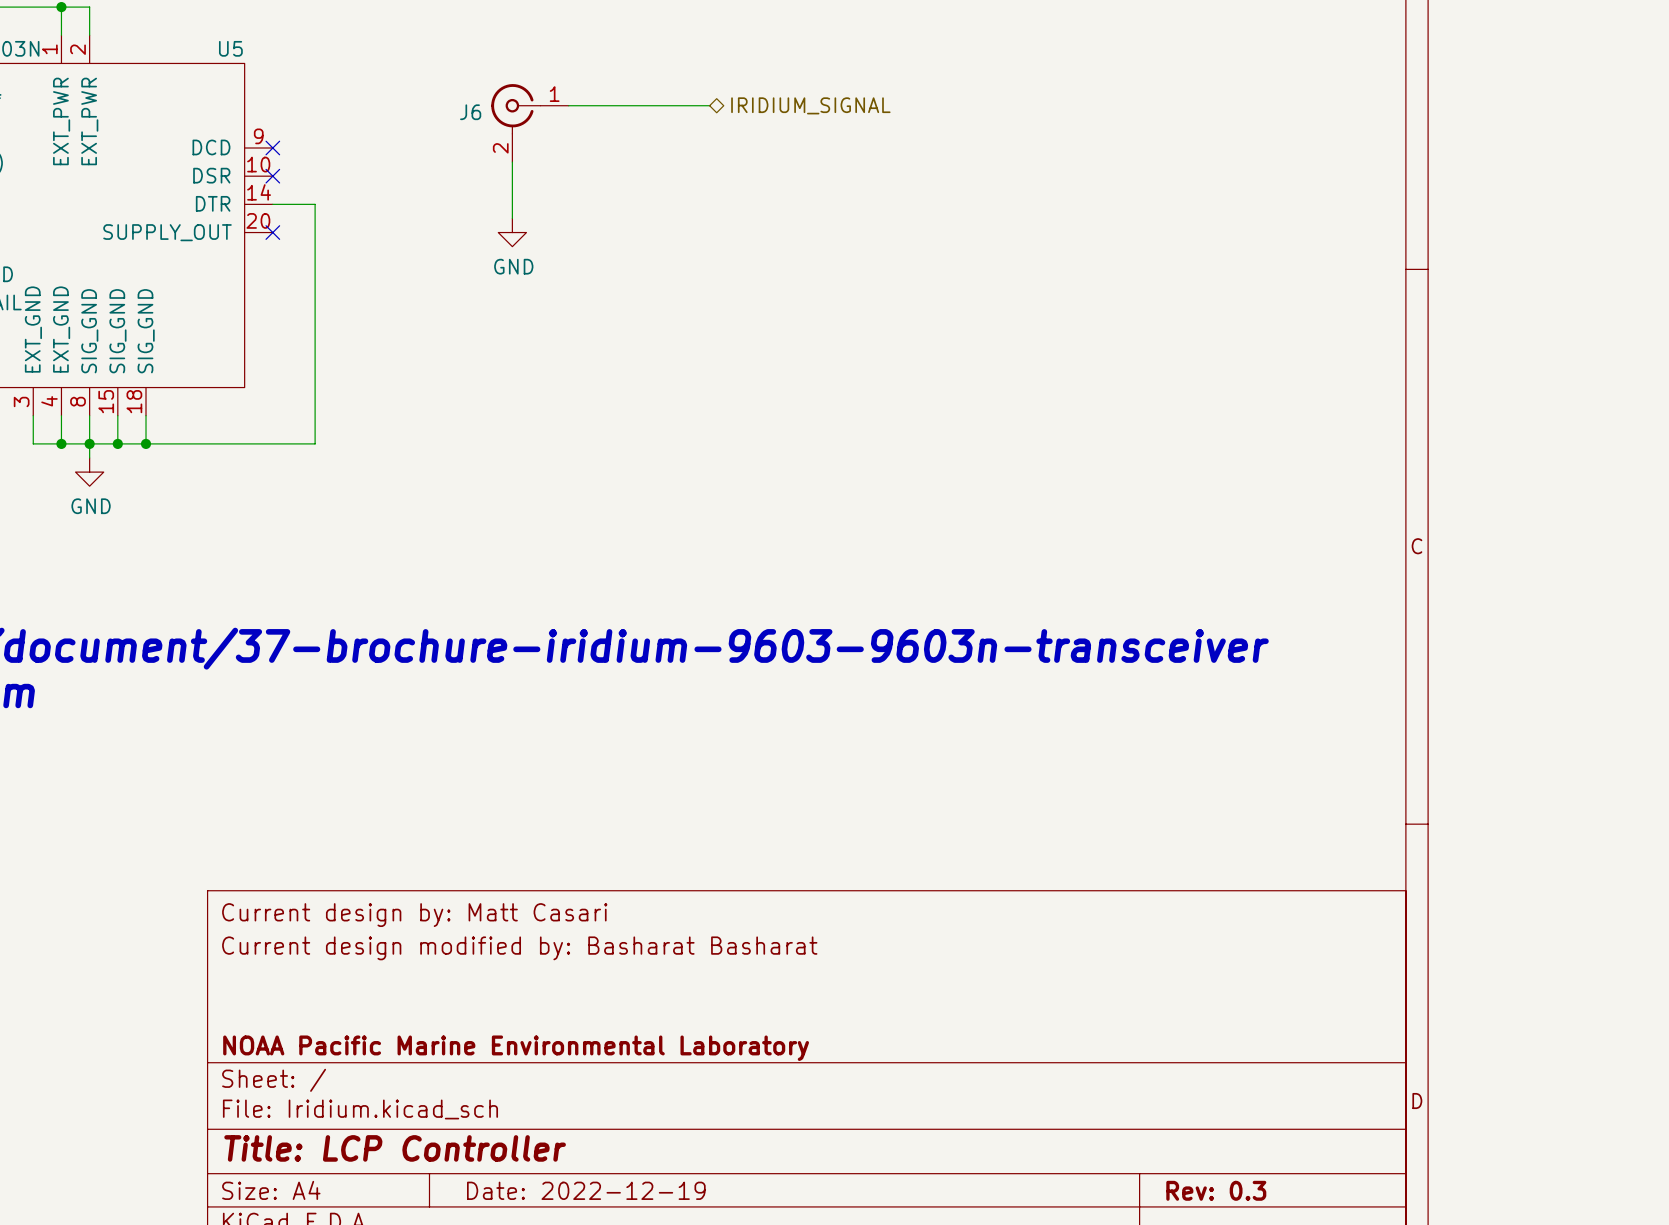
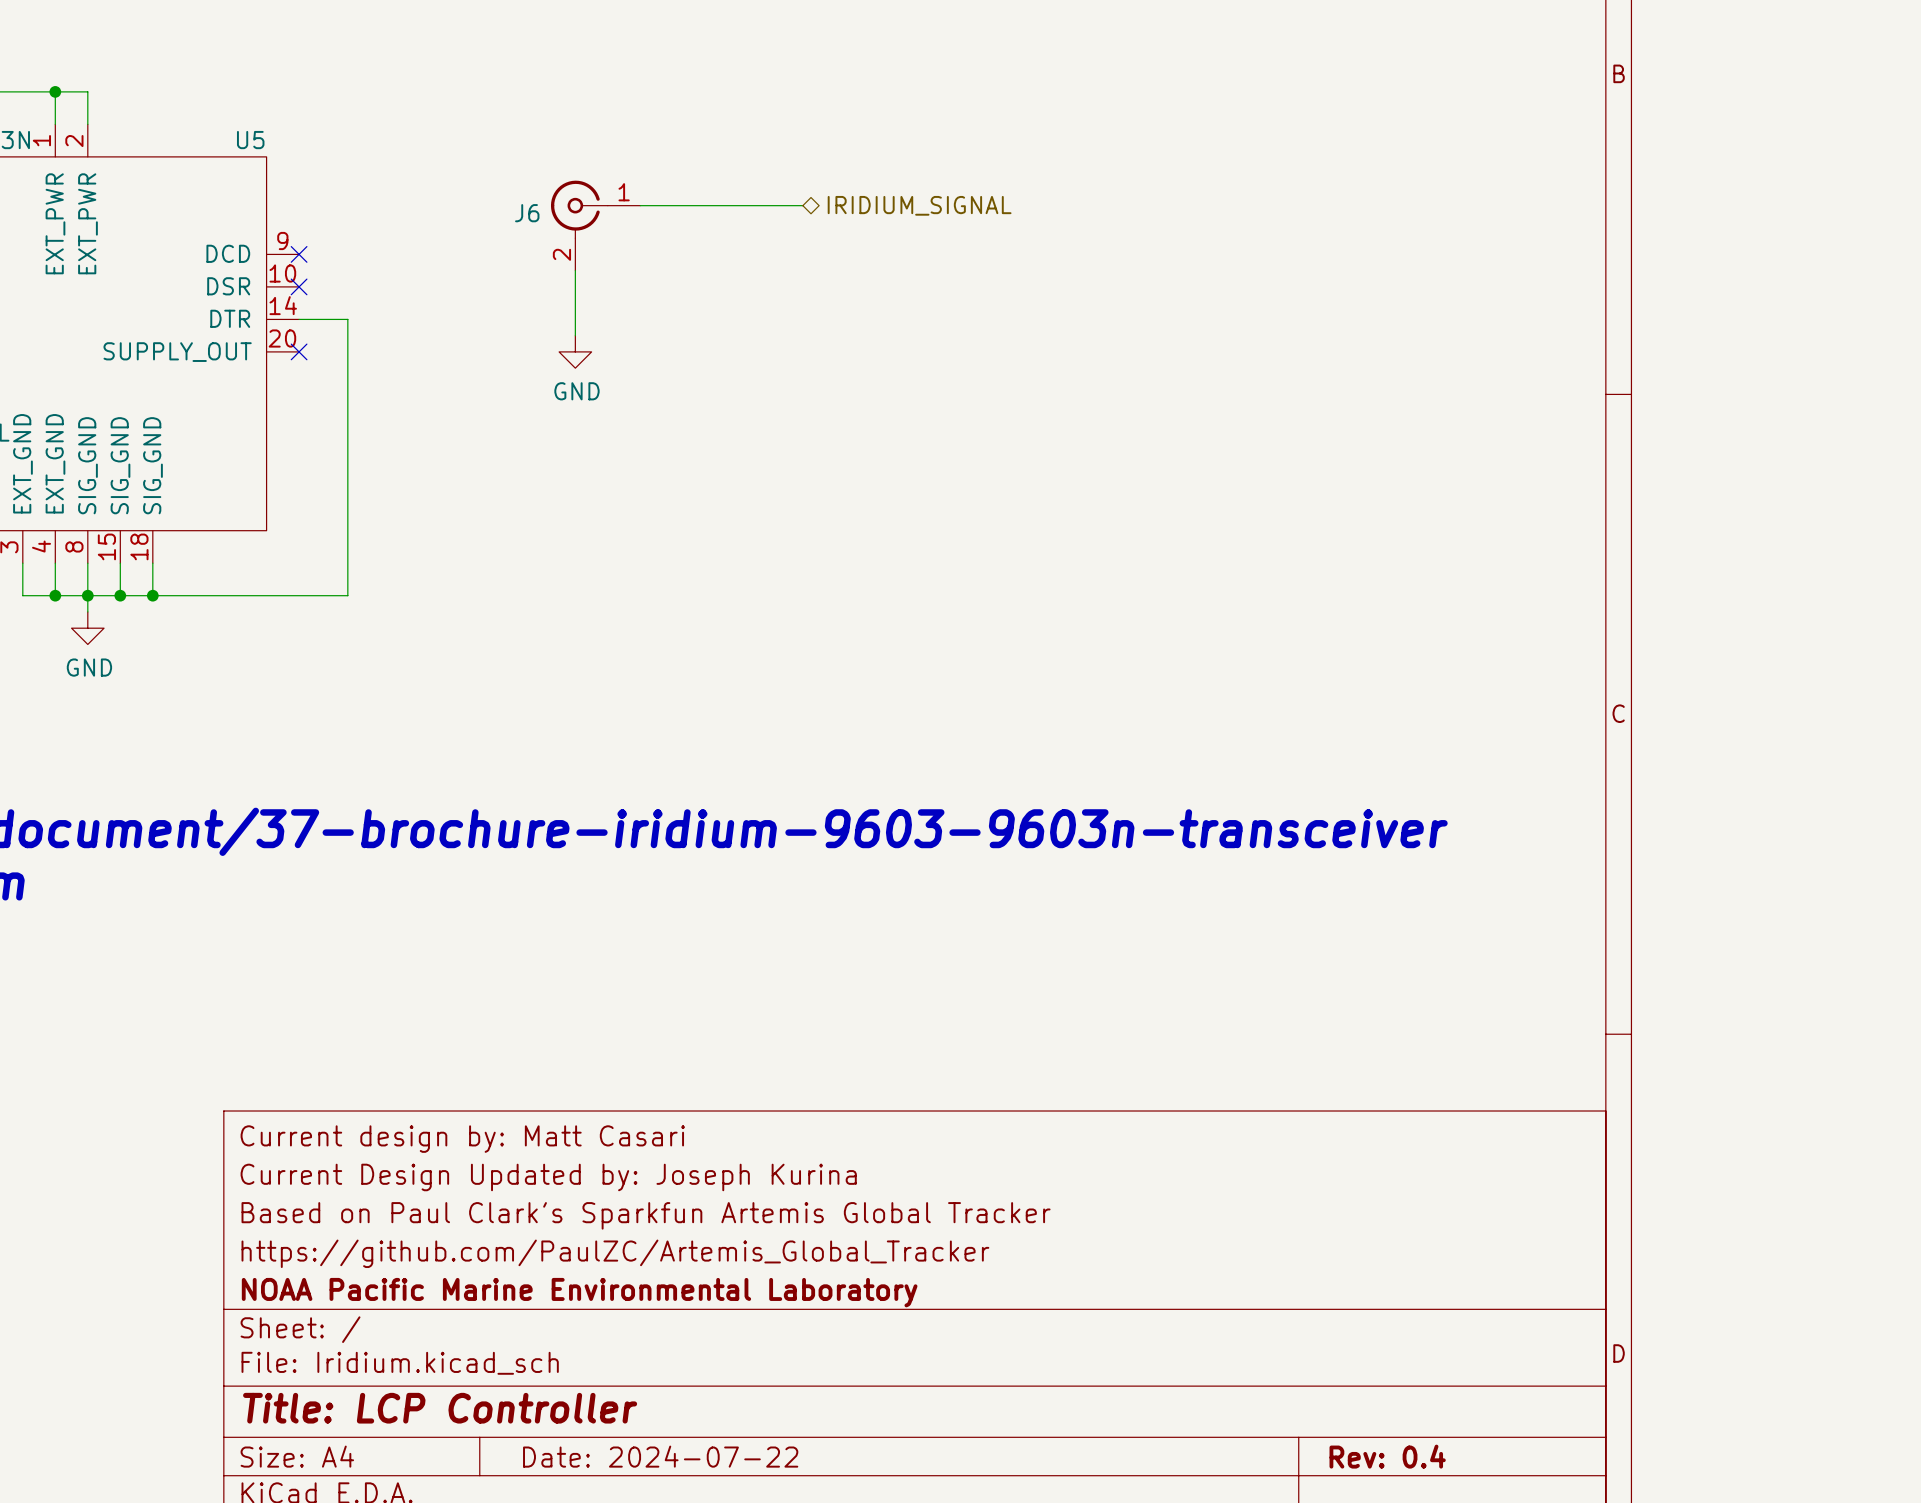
title block: Current design modified by: Basharat Basharat (519, 948) -> Current Design Updated by: Joseph Kurina (548, 1177)
title block: none -> Based on Paul Clark's Sparkfun Artemis Global Tracker (646, 1215)
title block: none -> https://github.com/PaulZC/Artemis_Global_Tracker (615, 1253)
title block: Date: 2022-12-19 (586, 1190) -> Date: 2024-07-22 (660, 1456)
title block: Rev: 0.3 (1216, 1190) -> Rev: 0.4 (1387, 1456)

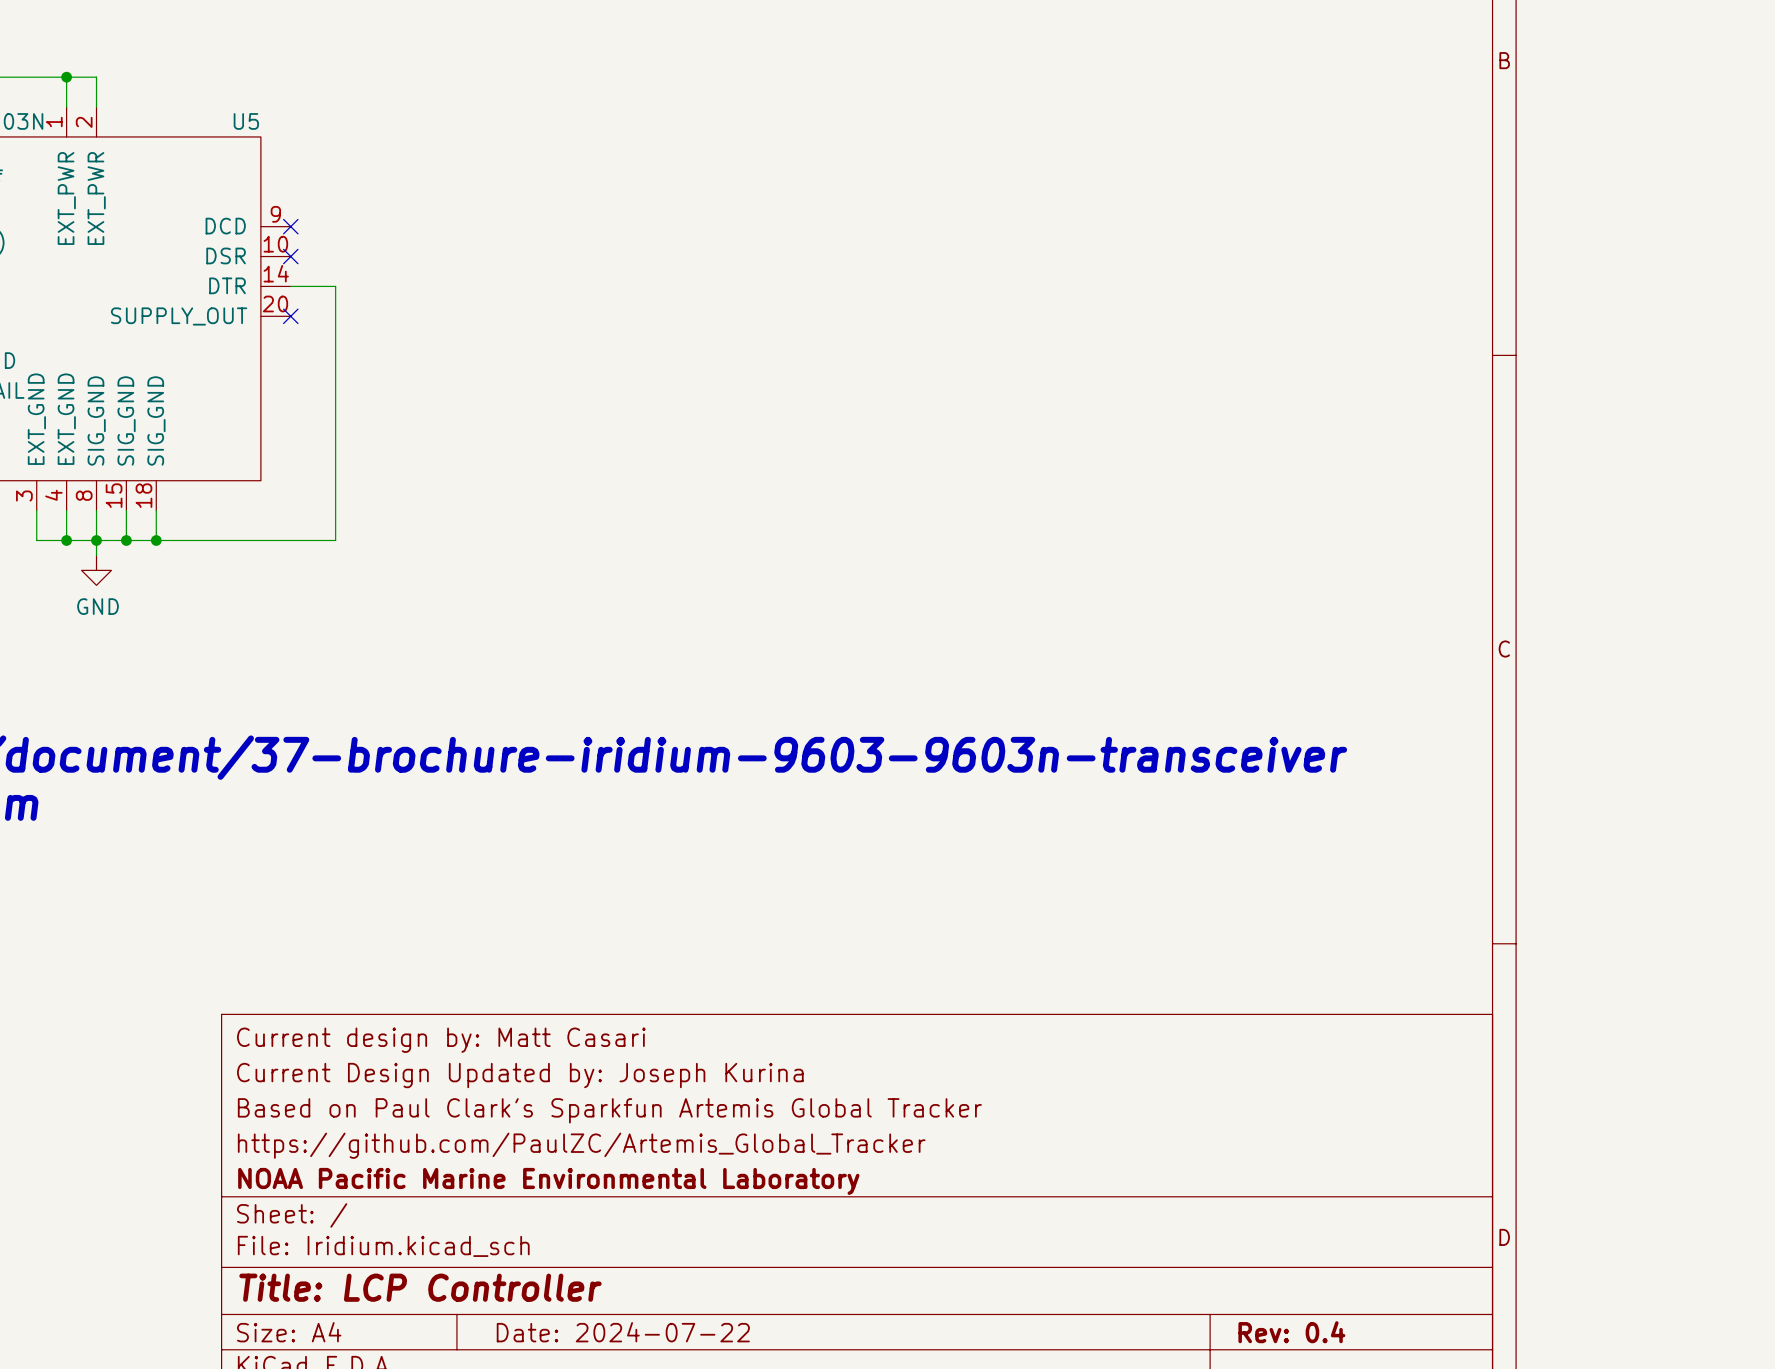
wire: (640, 205) (802, 205) -> none
hierarchical label: IRIDIUM_SIGNAL (919, 205) -> none
J6: (595, 225) -> none
wire: (575, 270) (575, 335) -> none
power symbol: GND (575, 351) -> none

